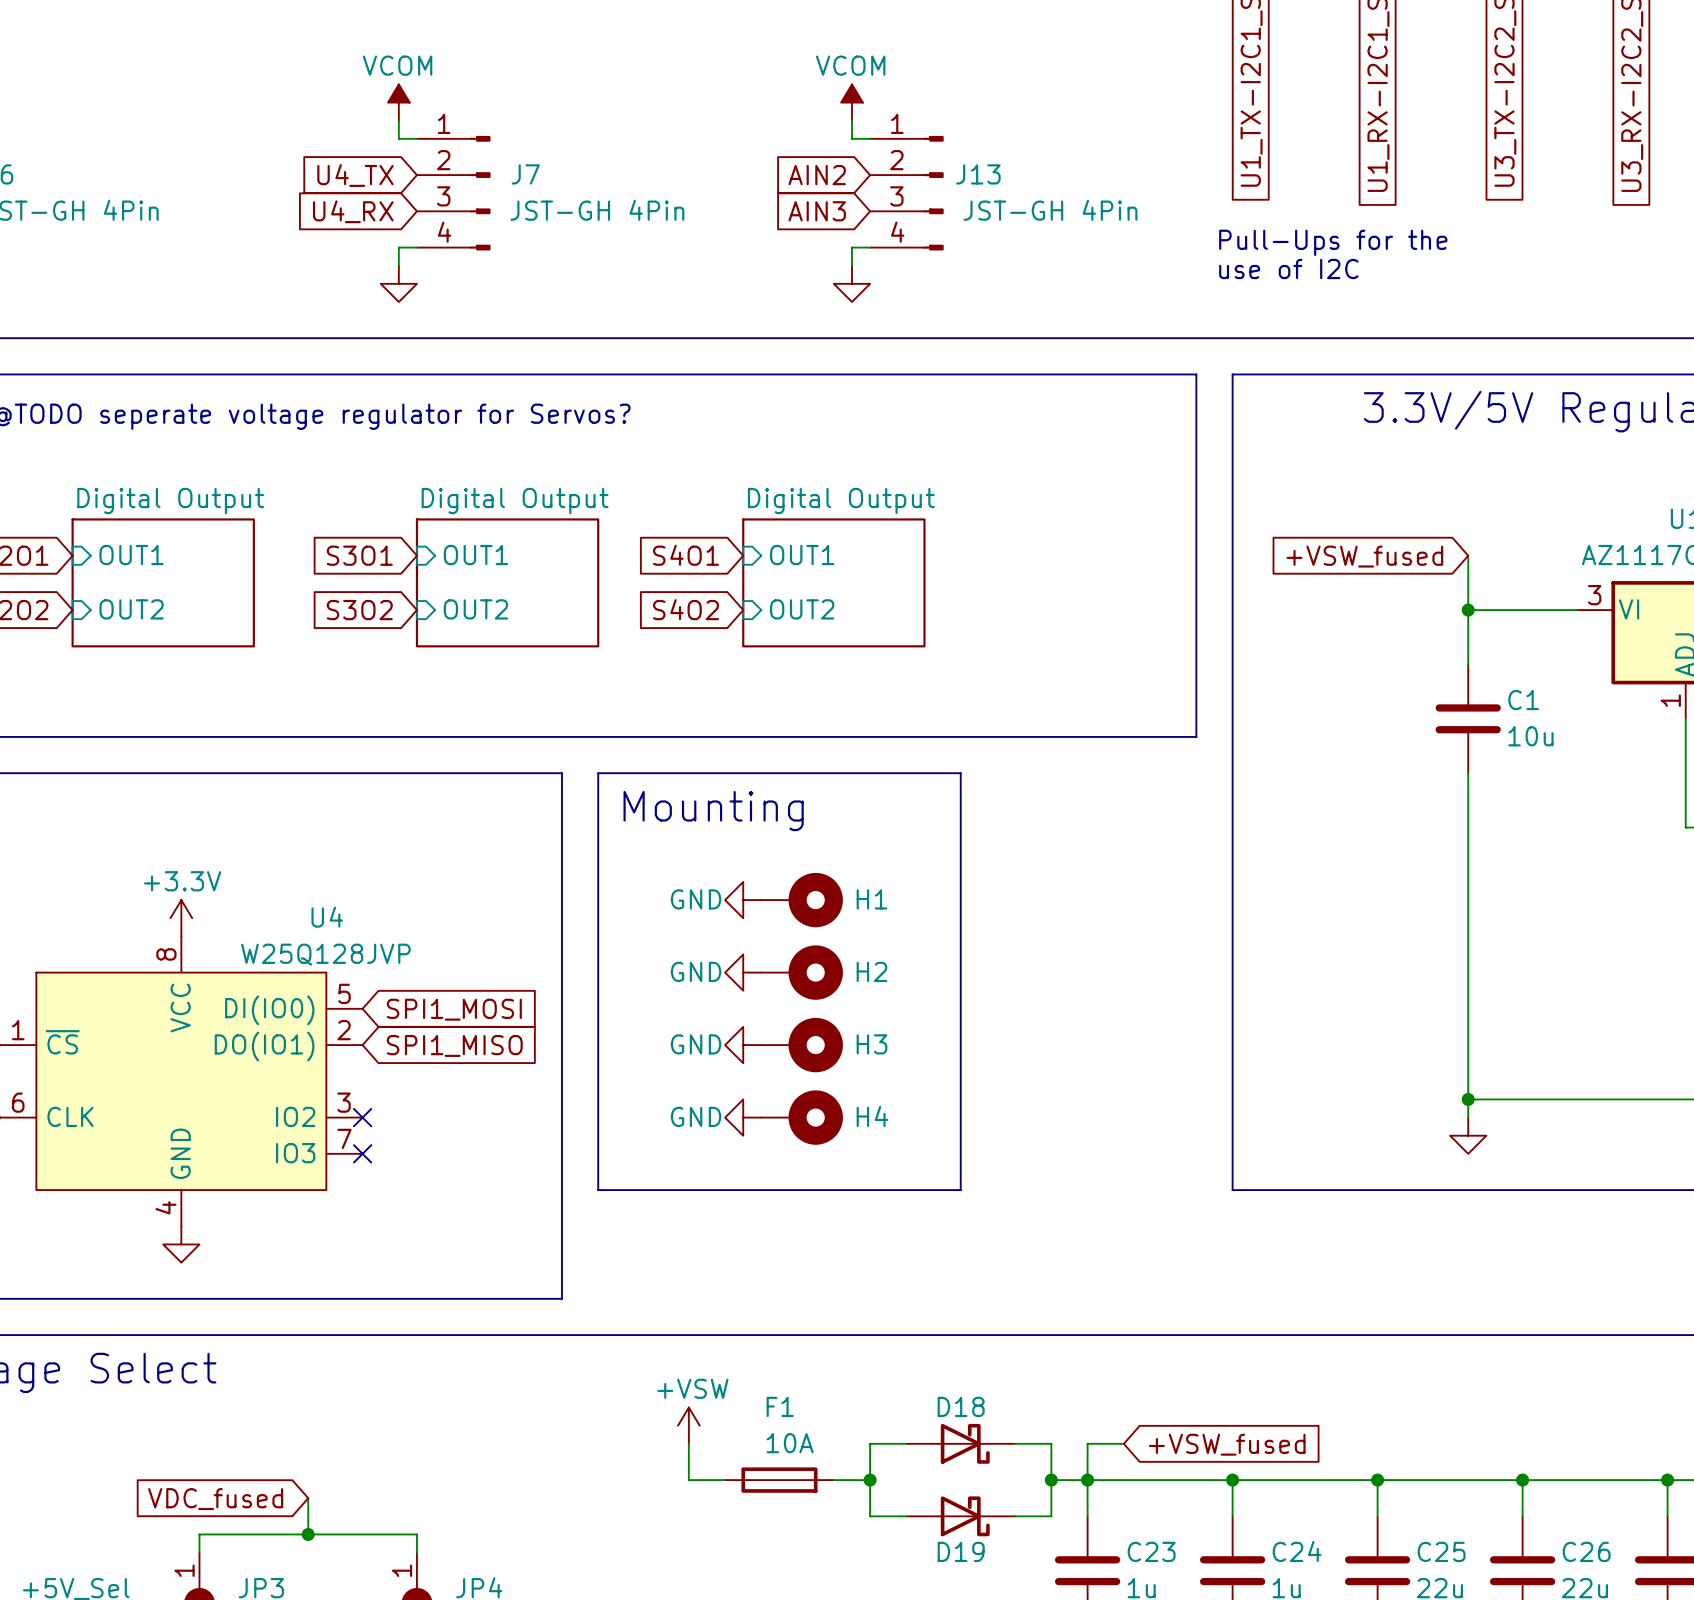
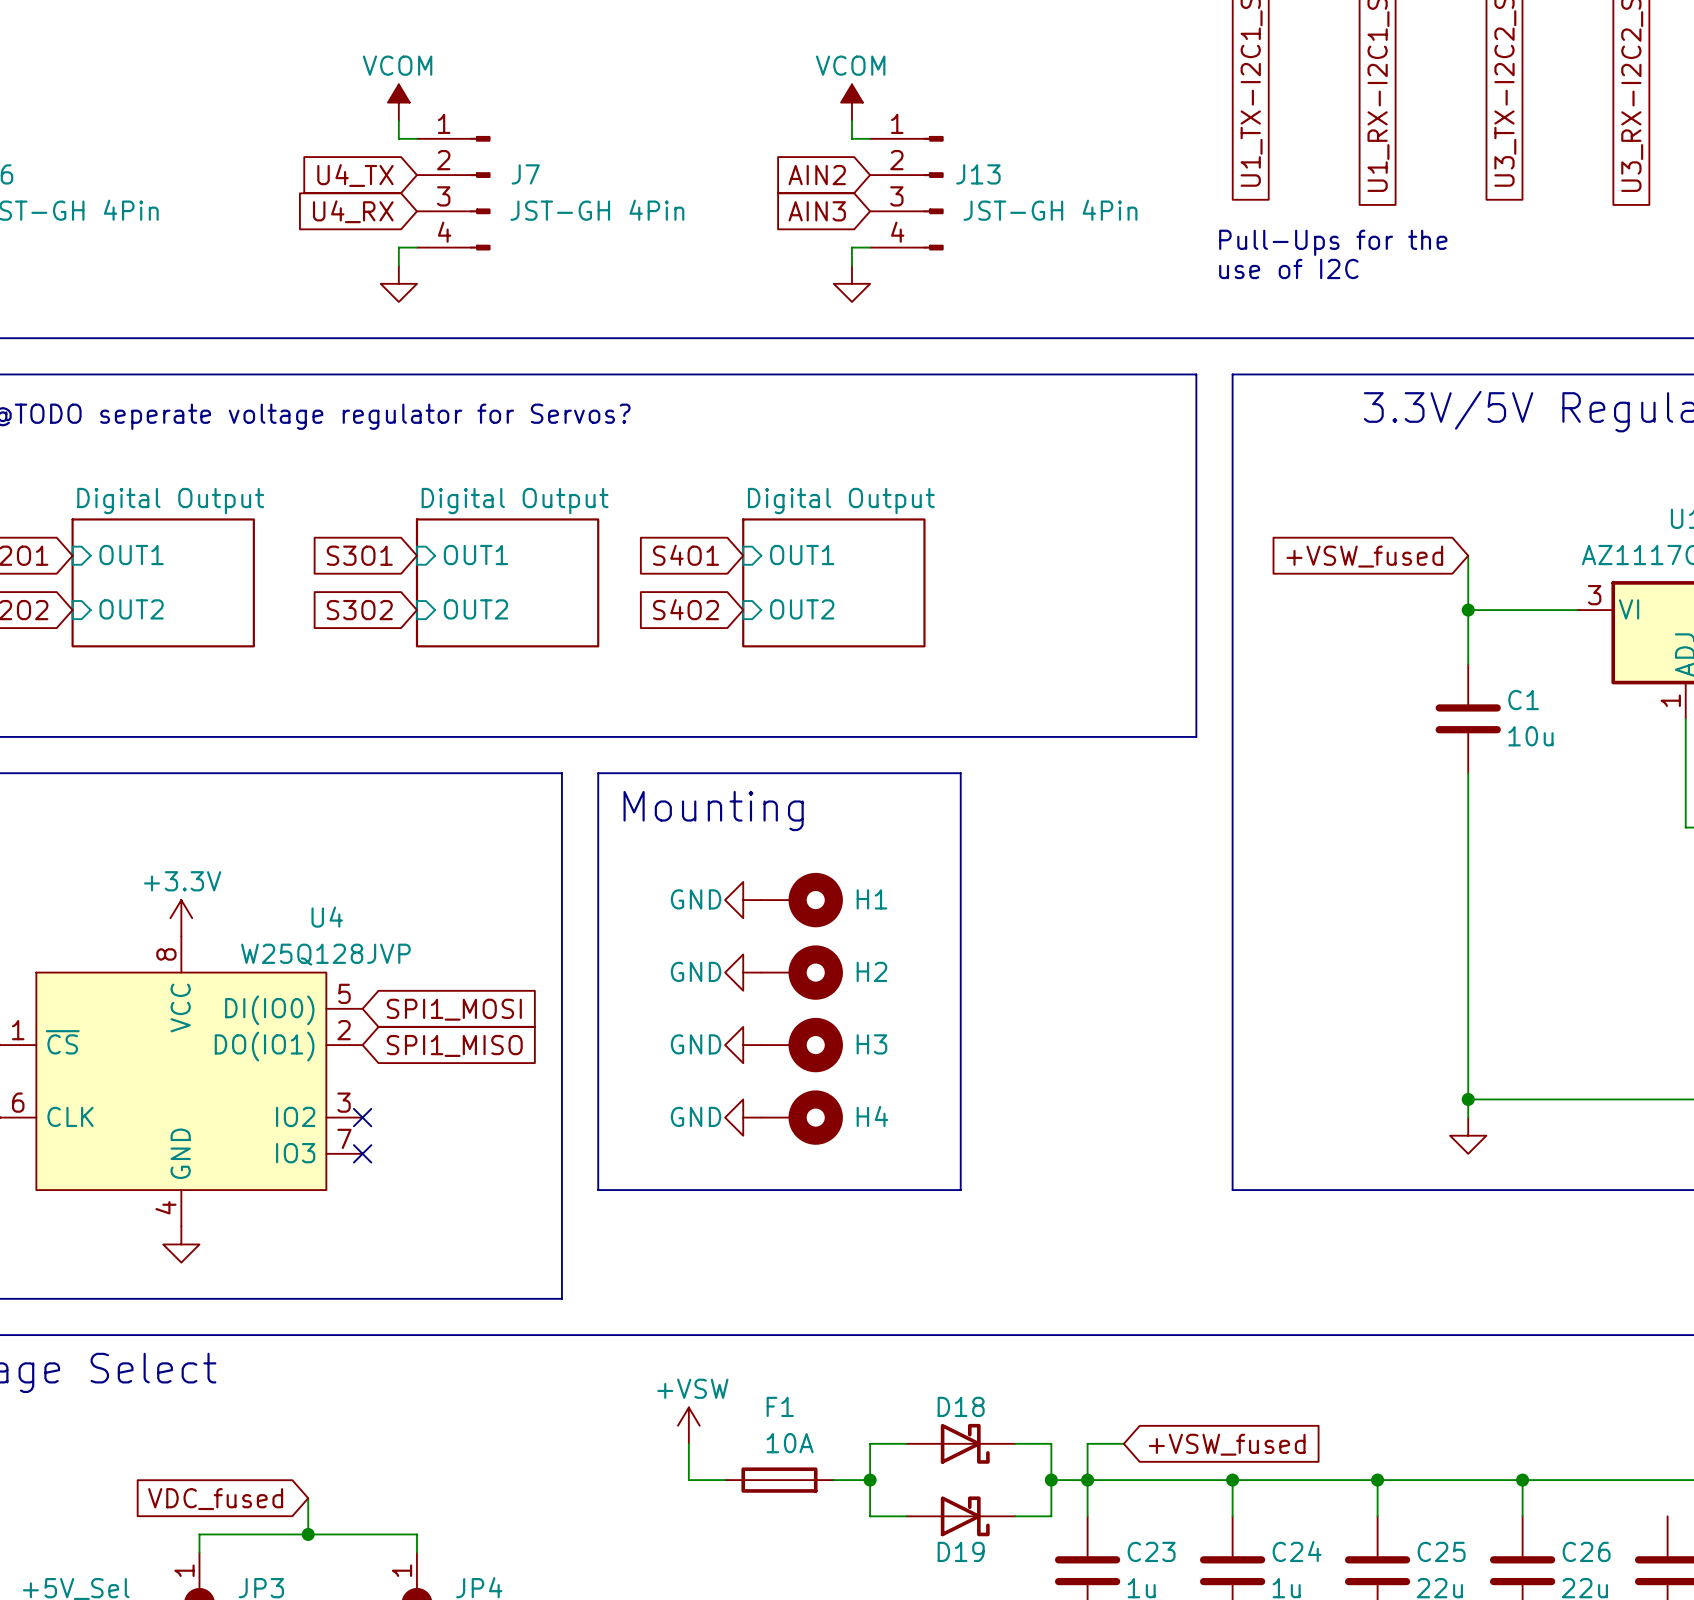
wire: (1667, 1480) (1667, 1516) -> none
junction: (1667, 1480) -> none

